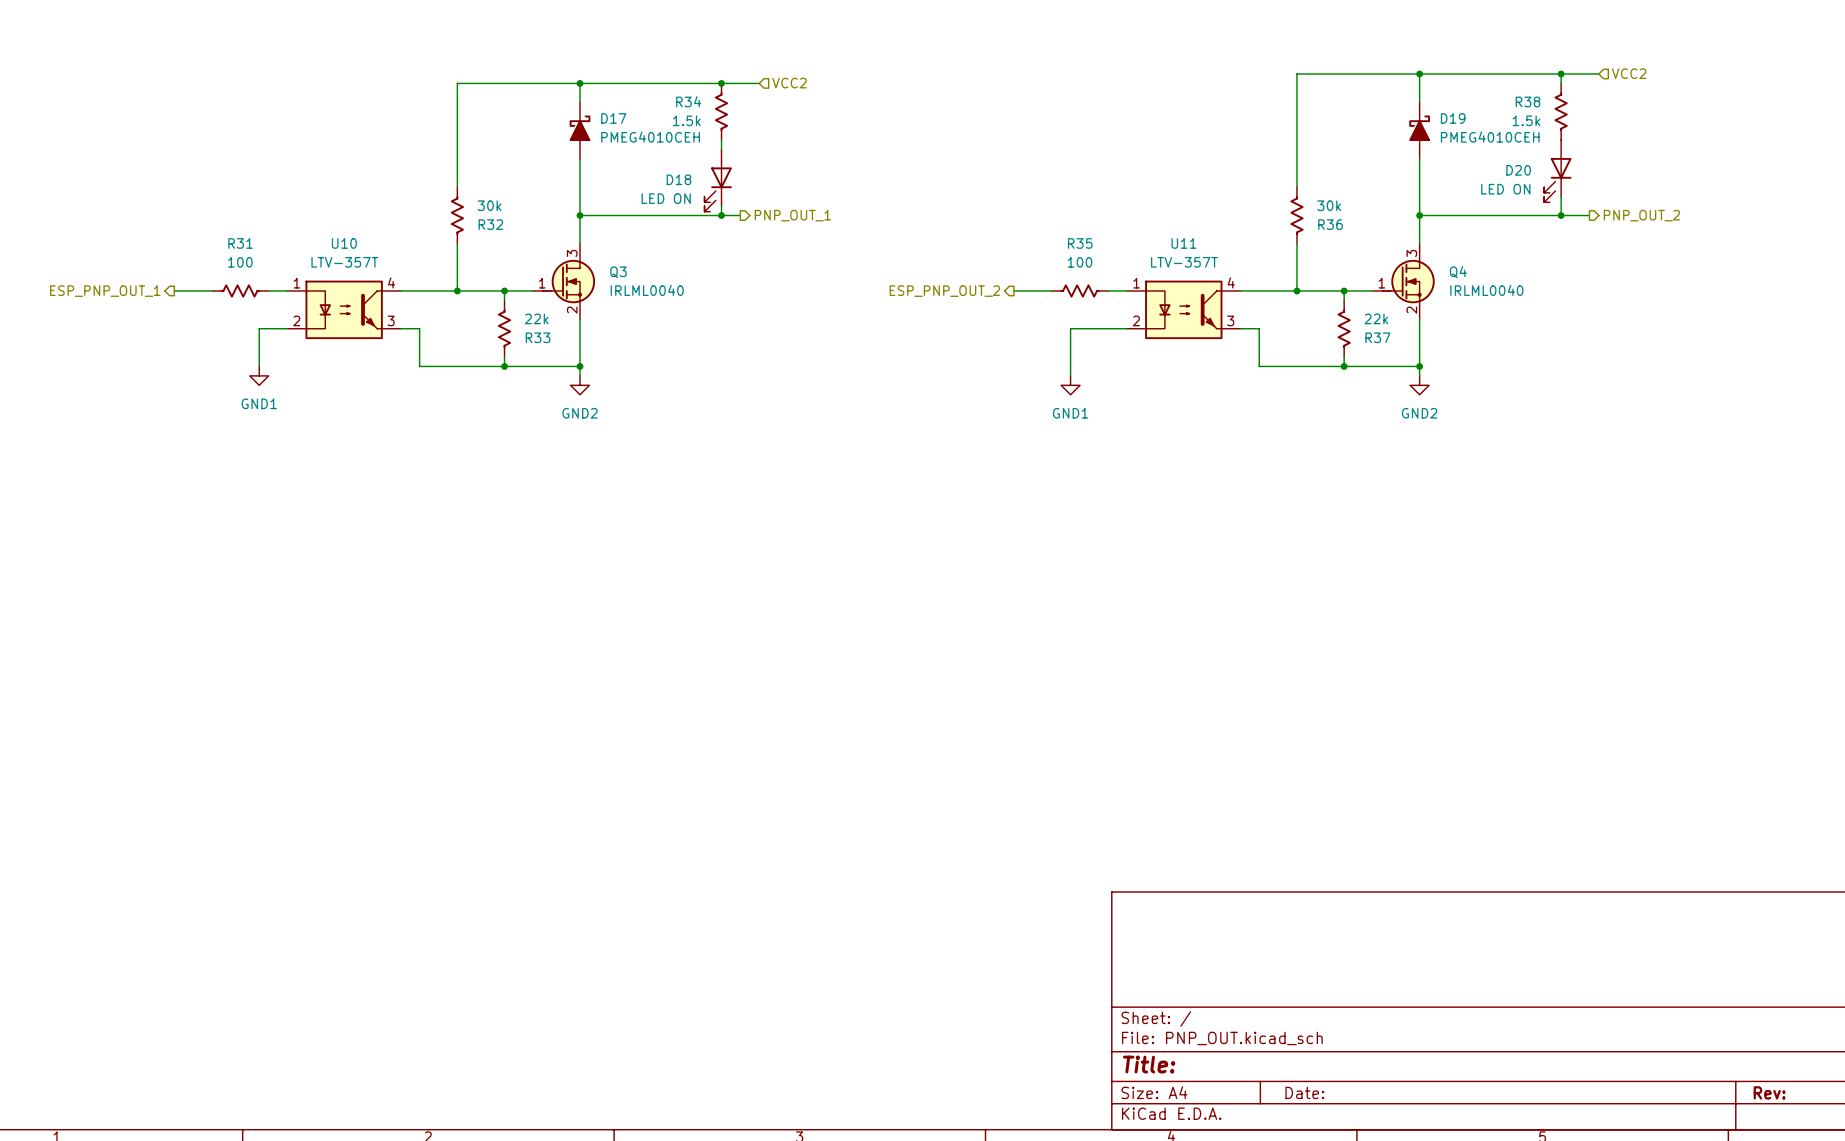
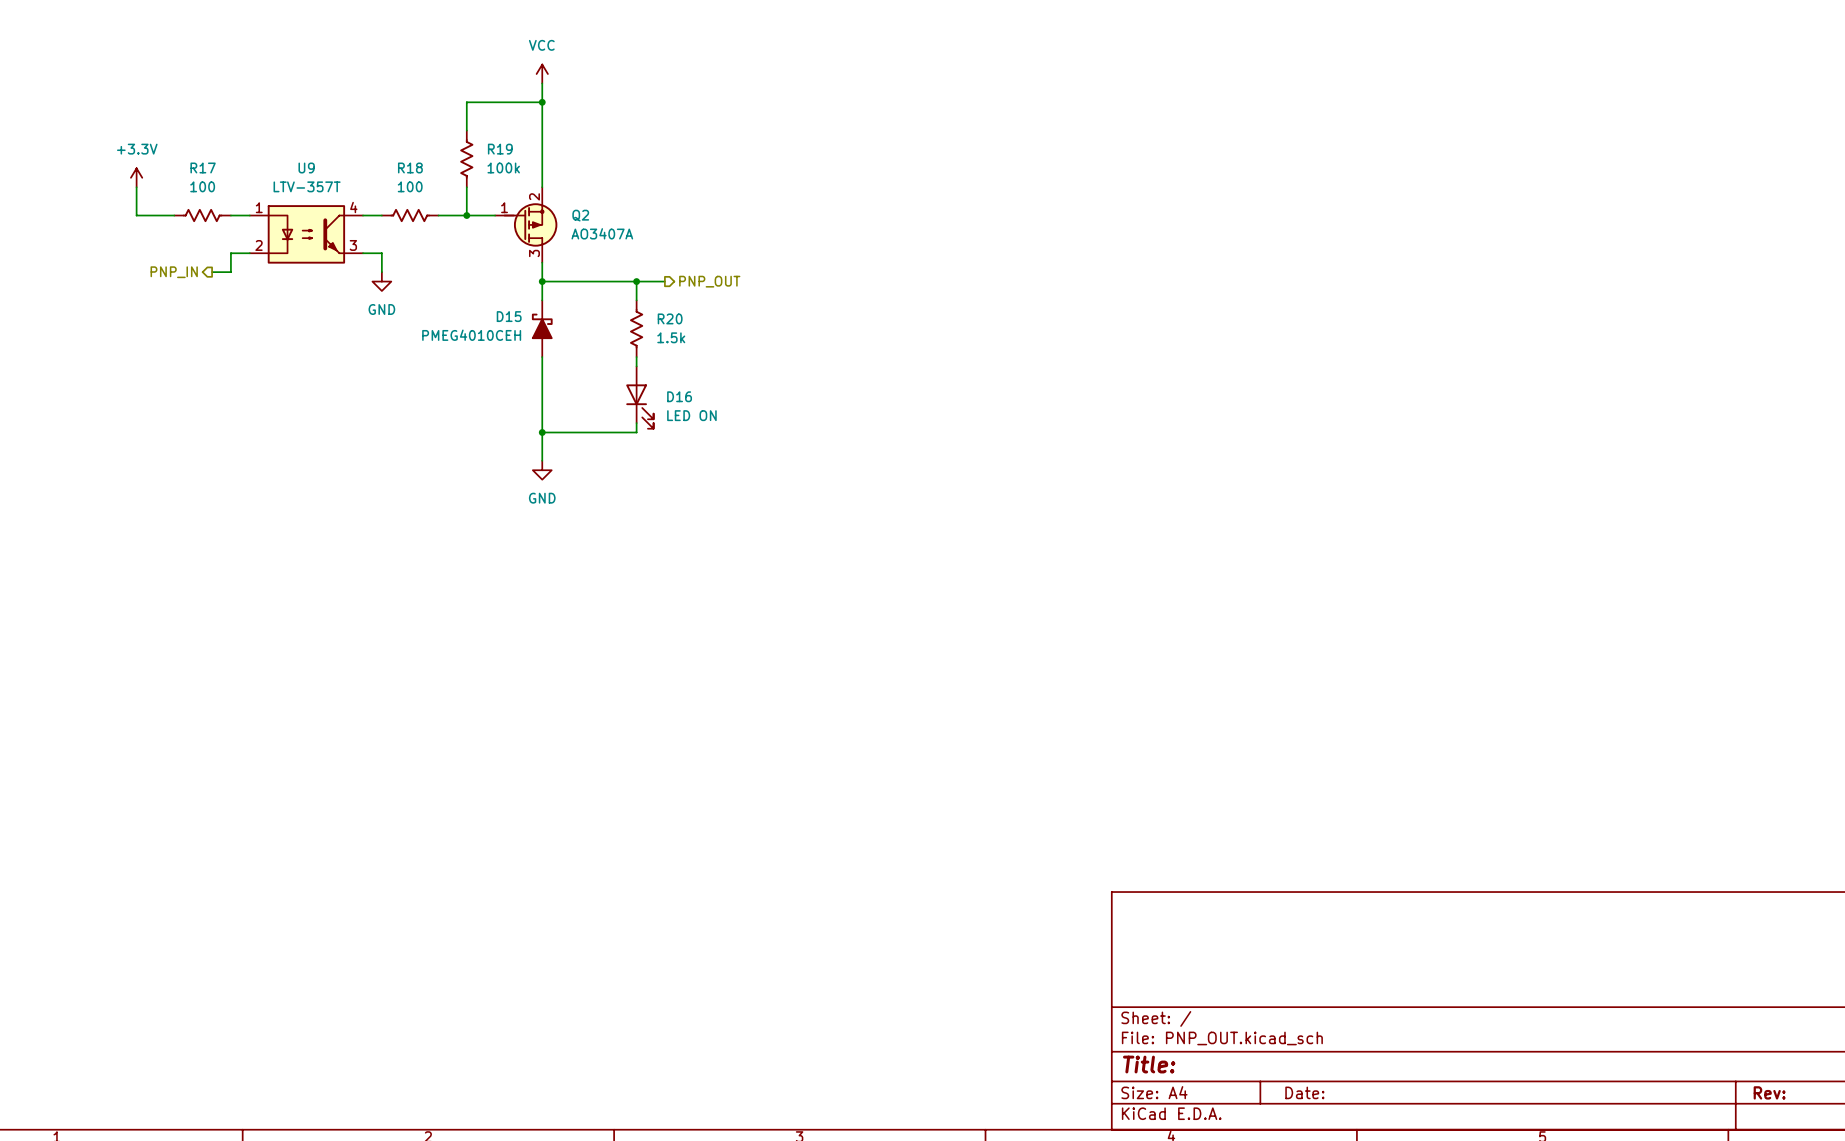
hierarchical label: VCC2 (1629, 73) -> none
power symbol: none -> VCC (542, 74)
wire: (1419, 74) (1419, 102) -> none
junction: (1419, 74) -> none
wire: (1561, 74) (1561, 83) -> none
junction: (1561, 74) -> none
wire: (1598, 74) (1296, 74) (1296, 187) -> none
wire: none -> (542, 83) (542, 187)
wire: (580, 83) (580, 102) -> none
junction position: (580, 83) -> (542, 102)
junction: (721, 83) -> none
wire: (759, 83) (457, 83) (457, 187) -> none
hierarchical label: VCC2 (789, 83) -> none
wire: none -> (542, 102) (466, 102) (466, 130)
R34: 1.5k (721, 111) -> none
R38: 1.5k (1561, 111) -> none
D17: PMEG4010CEH (580, 130) -> none
D19: PMEG4010CEH (1419, 130) -> none
wire: (721, 140) (721, 149) -> none
R19: none -> 100k (466, 158)
wire: (580, 158) (580, 243) -> none
wire: (1419, 158) (1419, 243) -> none
D20: LED ON (1557, 171) -> none
power symbol: none -> +3.3V (136, 177)
D18: LED ON (718, 180) -> none
wire: none -> (136, 187) (136, 215) (174, 215)
wire: none -> (466, 187) (466, 215)
wire: (1561, 196) (1561, 215) -> none
wire: (721, 206) (721, 215) -> none
R17: none -> 100 (202, 215)
wire: none -> (363, 215) (381, 215)
R18: none -> 100 (410, 215)
wire: none -> (438, 215) (495, 215)
R32: 30k (457, 215) -> none
junction: none -> (466, 215)
wire: (580, 215) (740, 215) -> none
junction: (580, 215) -> none
junction: (721, 215) -> none
hierarchical label: PNP_OUT_1 (792, 215) -> none
R36: 30k (1296, 215) -> none
wire: (1419, 215) (1589, 215) -> none
junction: (1419, 215) -> none
junction: (1561, 215) -> none
hierarchical label: PNP_OUT_2 (1641, 215) -> none
Q2: none -> AO3407A (526, 224)
U9: none -> LTV-357T (306, 234)
wire: (457, 243) (457, 290) -> none
wire: (1296, 243) (1296, 290) -> none
wire: none -> (249, 253) (230, 253) (230, 272) (212, 272)
wire: none -> (363, 253) (381, 253) (381, 272)
wire: none -> (542, 262) (542, 300)
hierarchical label: none -> PNP_IN (174, 272)
power symbol: none -> GND (381, 281)
wire: none -> (542, 281) (664, 281)
junction: none -> (542, 281)
Q3: IRLML0040 (563, 281) -> none
wire: none -> (636, 281) (636, 300)
junction: none -> (636, 281)
hierarchical label: none -> PNP_OUT (709, 281)
Q4: IRLML0040 (1403, 281) -> none
wire: (174, 290) (212, 290) -> none
R31: 100 (240, 290) -> none
wire: (268, 290) (287, 290) -> (230, 215) (249, 215)
wire: (400, 290) (532, 290) -> none
junction: (457, 290) -> none
wire: (504, 290) (504, 300) -> none
junction: (504, 290) -> none
wire: (1013, 290) (1051, 290) -> none
R35: 100 (1080, 290) -> none
wire: (1108, 290) (1127, 290) -> none
wire: (1240, 290) (1372, 290) -> none
junction: (1296, 290) -> none
wire: (1344, 290) (1344, 300) -> none
junction: (1344, 290) -> none
hierarchical label: ESP_PNP_OUT_1 (105, 291) -> none
hierarchical label: ESP_PNP_OUT_2 (944, 291) -> none
U10: LTV-357T (344, 309) -> none
U11: LTV-357T (1183, 309) -> none
wire: (580, 319) (580, 375) -> none
wire: (1419, 319) (1419, 375) -> none
wire: (287, 328) (259, 328) (259, 366) -> none
wire: (400, 328) (419, 328) (419, 366) (580, 366) -> none
R33: 22k (504, 328) -> none
D15: none -> PMEG4010CEH (542, 328)
R20: none -> 1.5k (636, 328)
wire: (1127, 328) (1070, 328) (1070, 375) -> none
wire: (1240, 328) (1259, 328) (1259, 366) (1419, 366) -> none
R37: 22k (1344, 328) -> none
wire: (504, 357) (504, 366) -> (636, 357) (636, 366)
wire: none -> (542, 357) (542, 460)
wire: (1344, 357) (1344, 366) -> none
junction: (504, 366) -> none
junction: (580, 366) -> none
junction: (1344, 366) -> none
junction: (1419, 366) -> none
power symbol: GND1 (259, 375) -> none
power symbol: GND2 (580, 385) -> none
power symbol: GND1 (1070, 385) -> none
power symbol: GND2 (1419, 385) -> none
D16: none -> LED ON (639, 397)
wire: none -> (636, 423) (636, 432) (542, 432)
junction: none -> (542, 432)
power symbol: none -> GND (542, 470)

